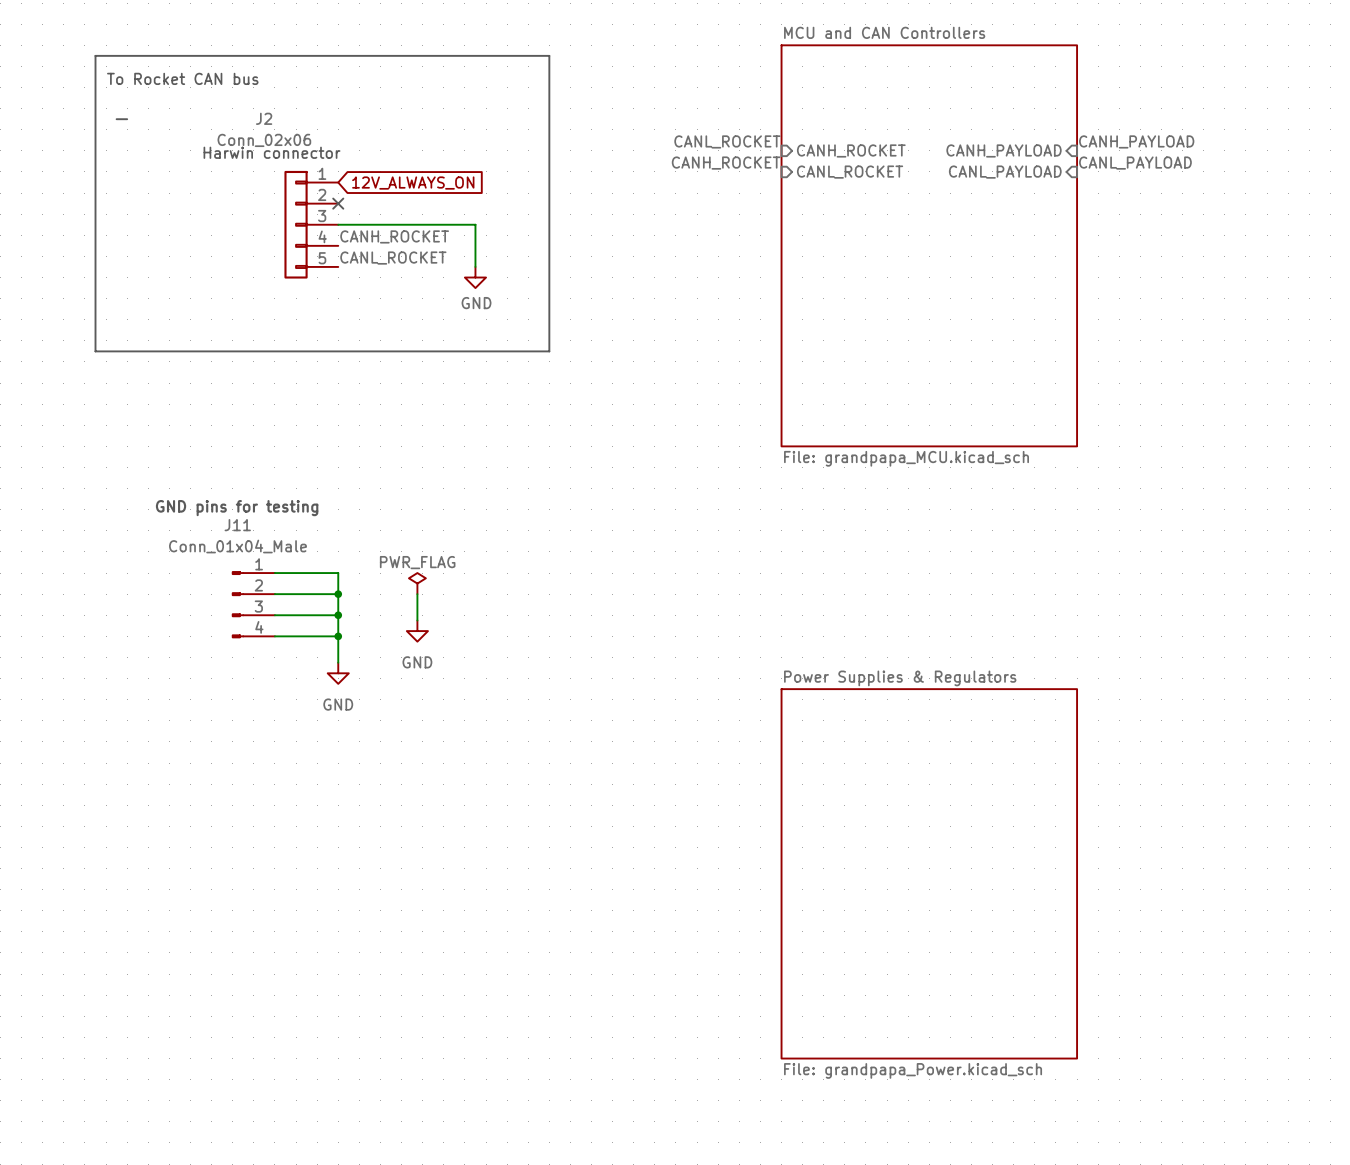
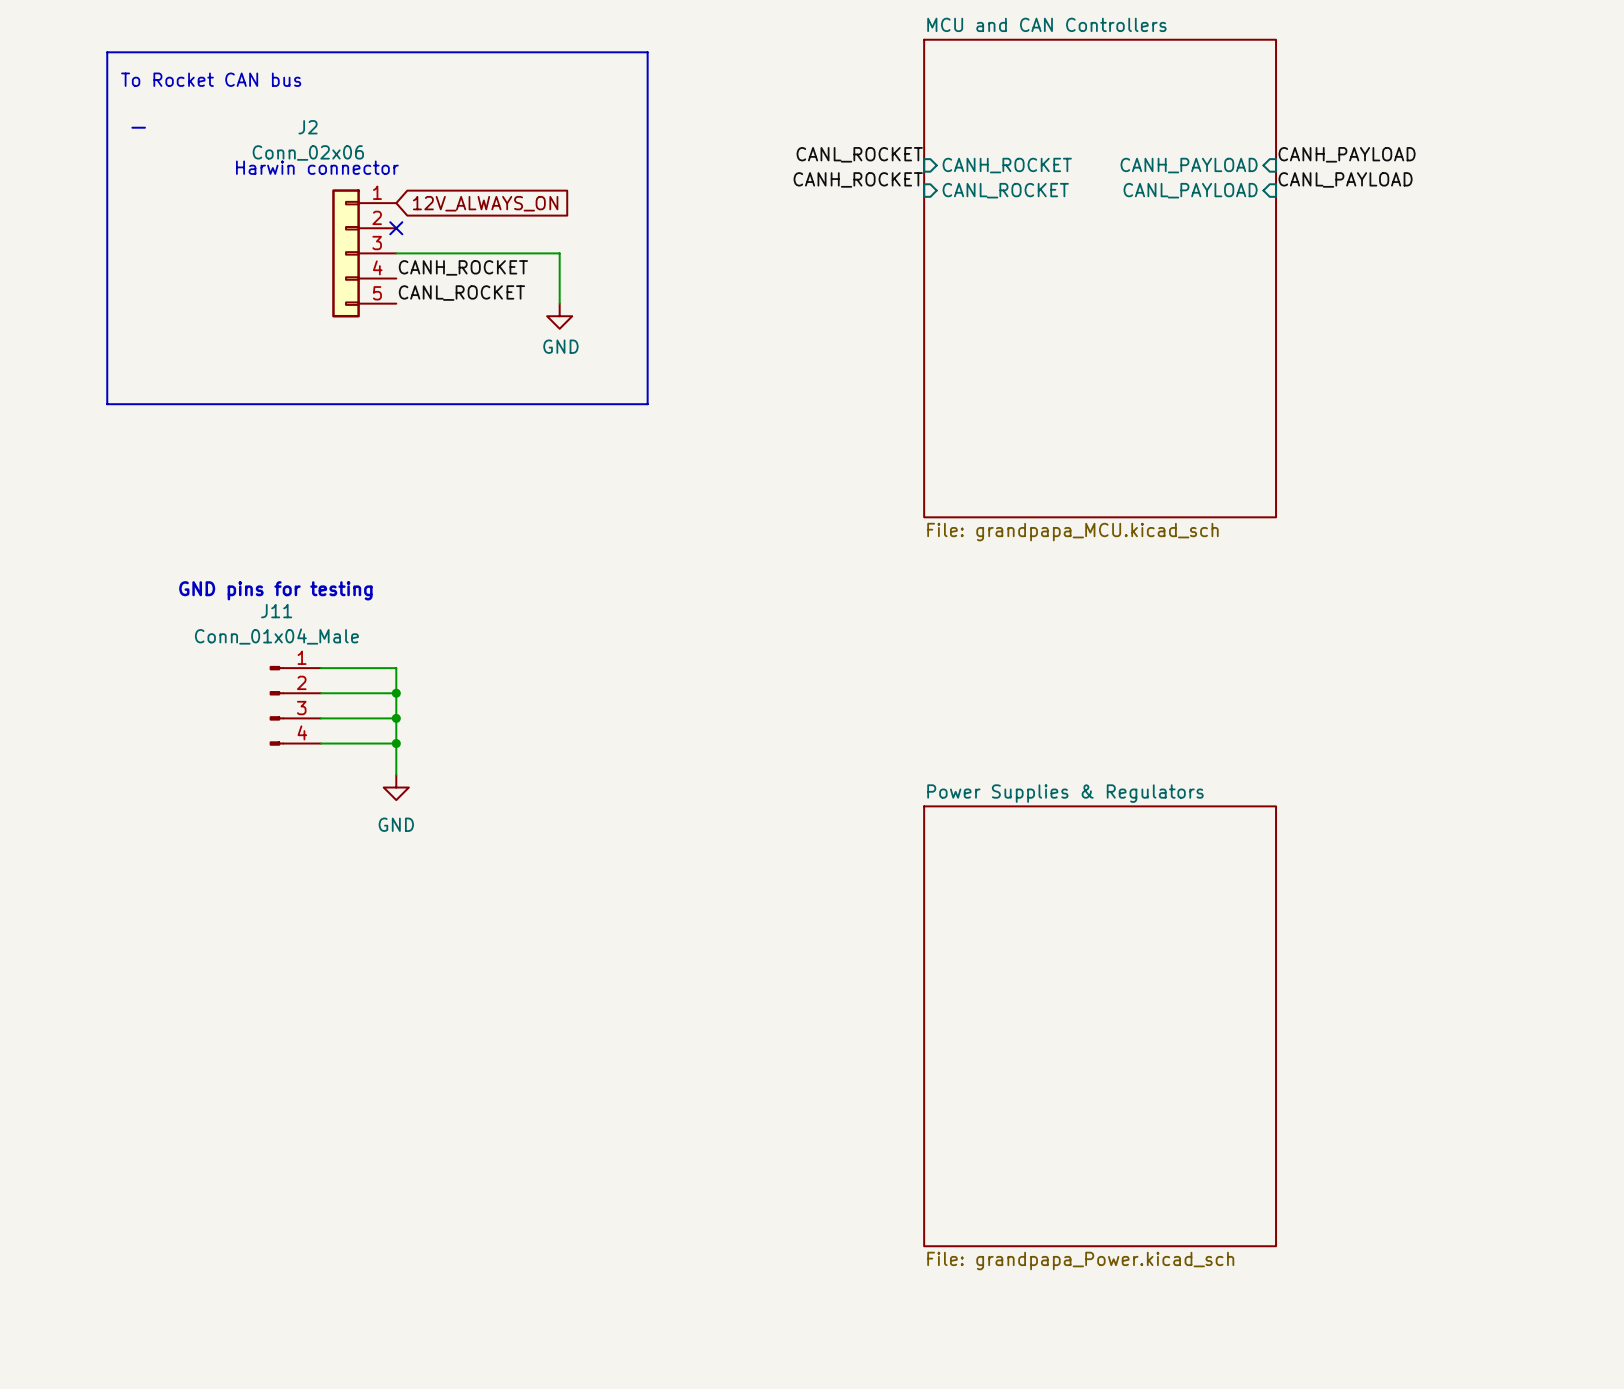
power symbol: PWR_FLAG (417, 583) -> none
wire: (417, 594) (417, 620) -> none
power symbol: GND (417, 631) -> none

